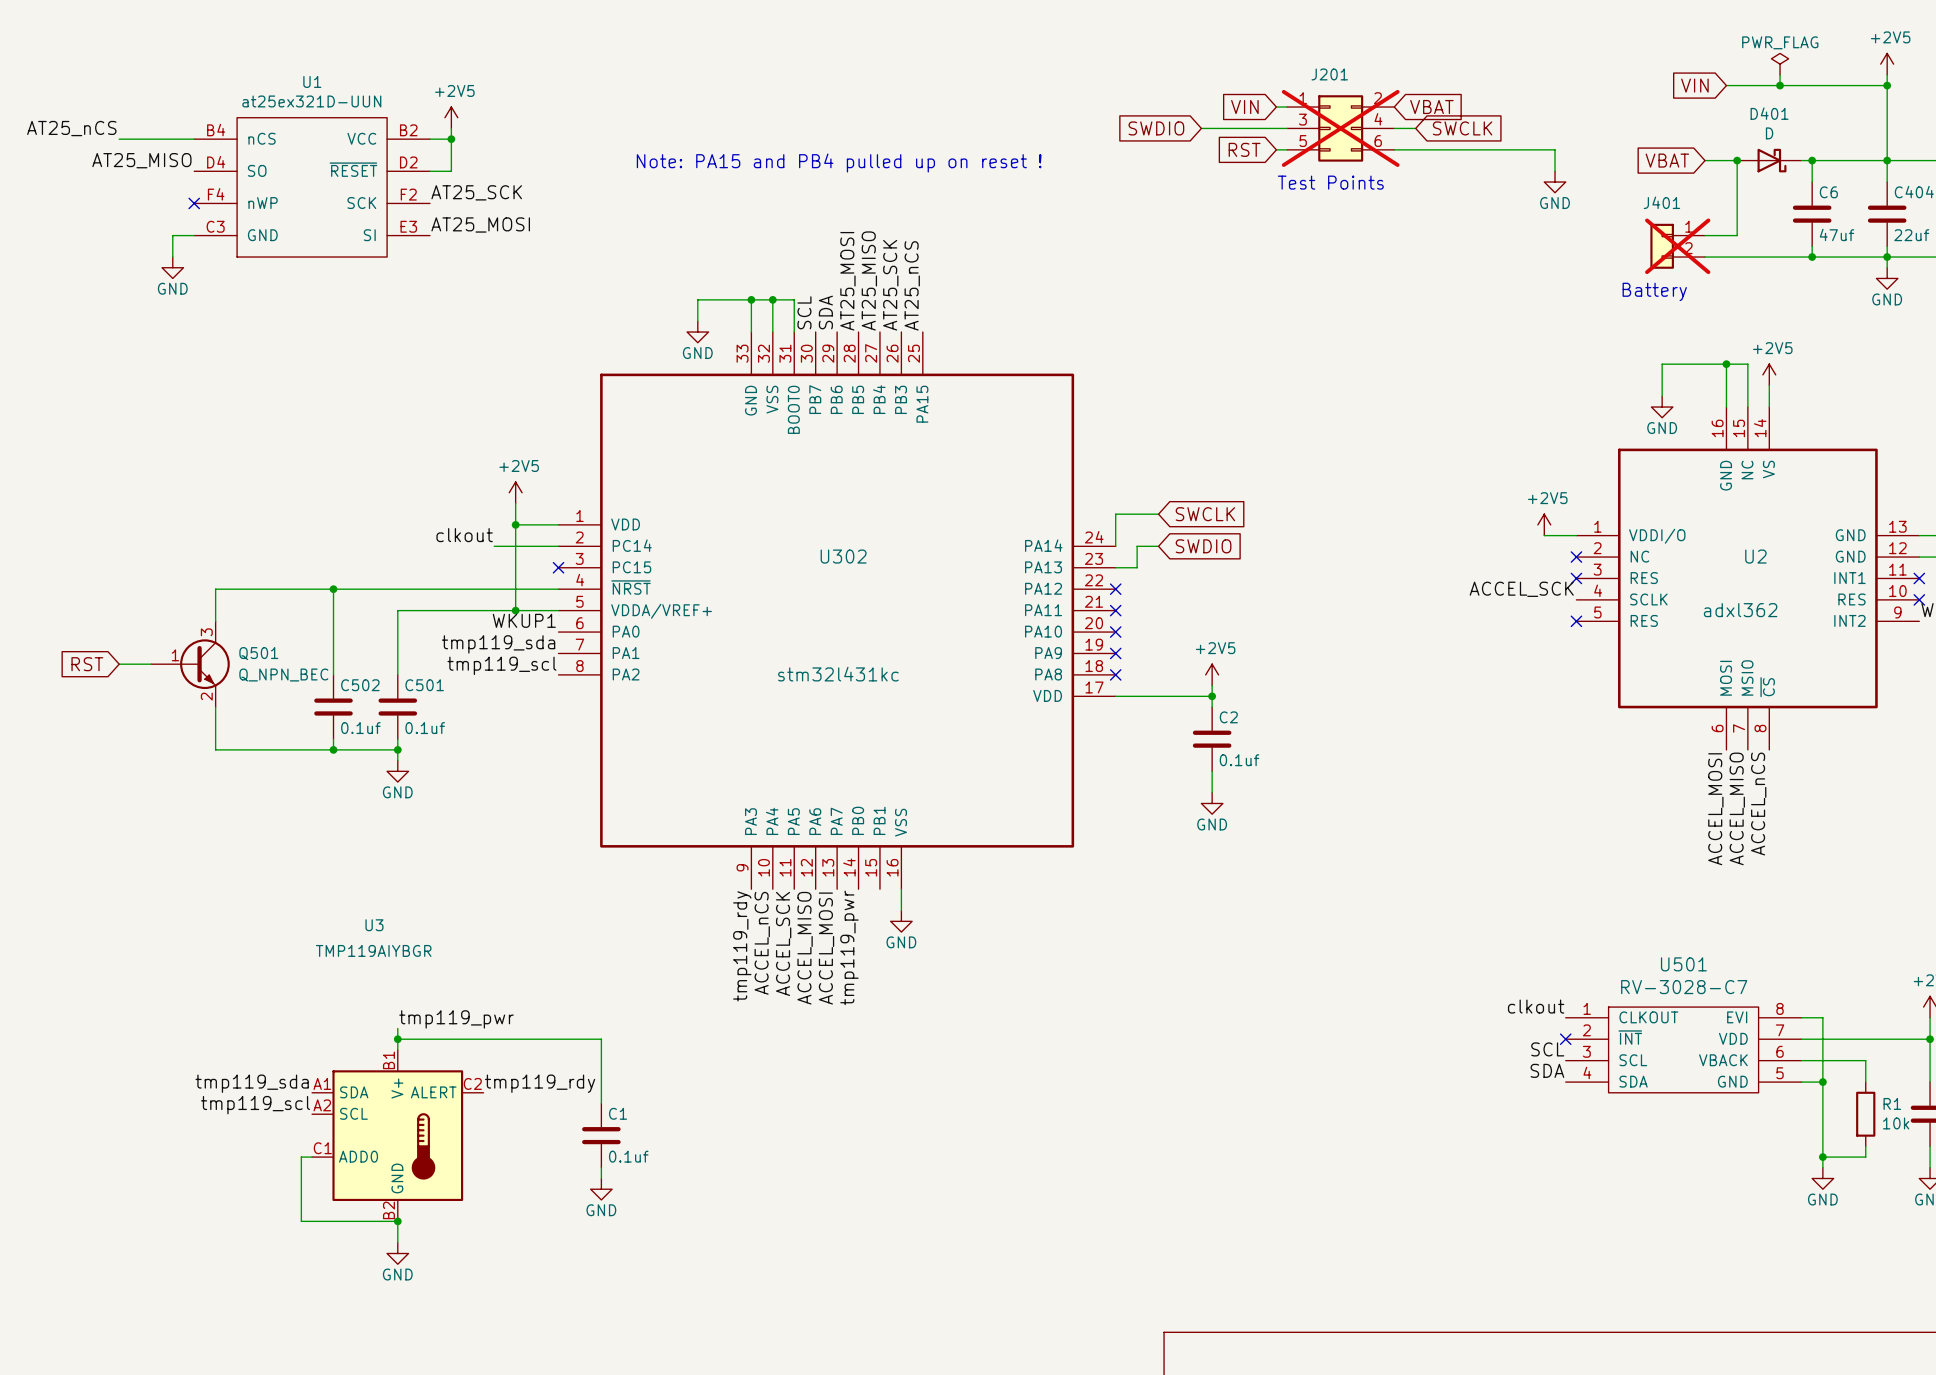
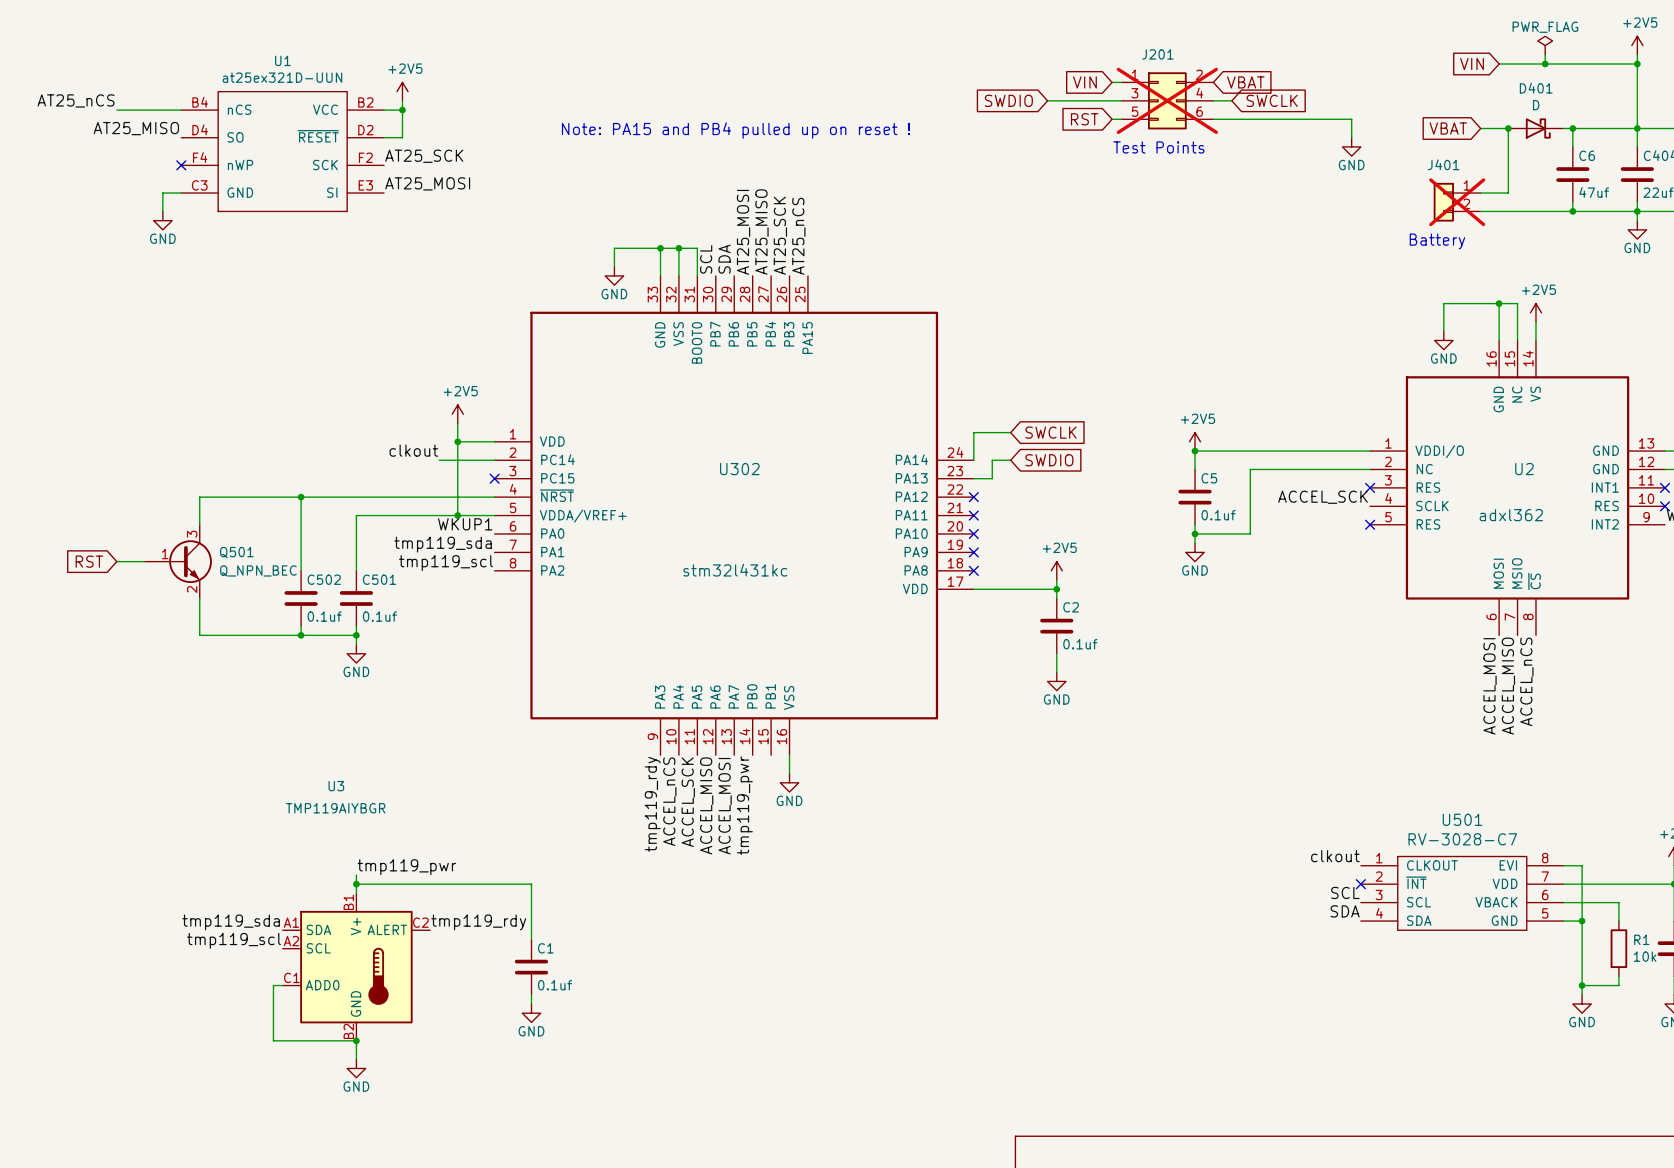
power symbol position: +2V5 (1544, 524) -> +2V5 (1195, 441)
junction: none -> (1195, 451)
wire: none -> (1342, 451) (1195, 451) (1195, 469)
wire: none -> (1370, 469) (1250, 469) (1250, 533) (1195, 533)
no-connect mark: (1576, 557) -> none
C5: none -> 0.1uf (1195, 497)
wire: none -> (1195, 524) (1195, 543)
junction: none -> (1195, 533)
power symbol: none -> GND (1195, 552)

